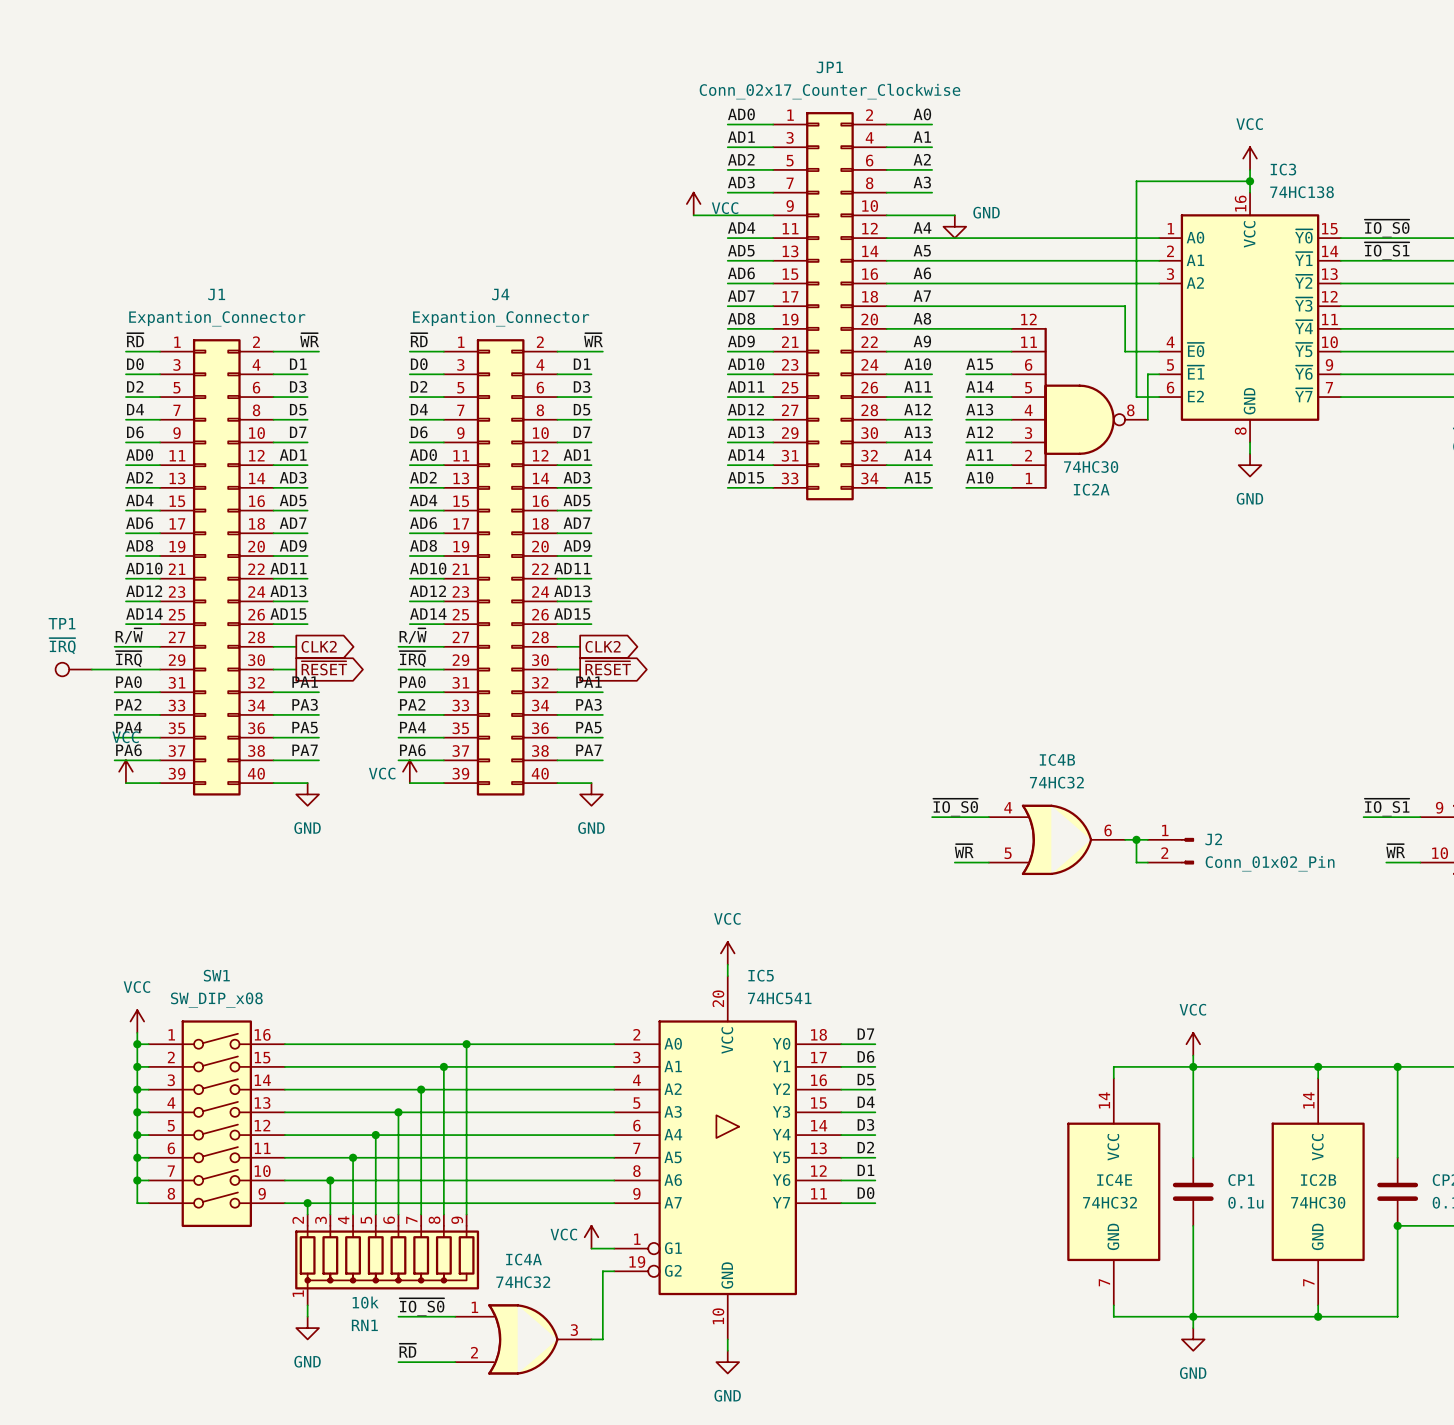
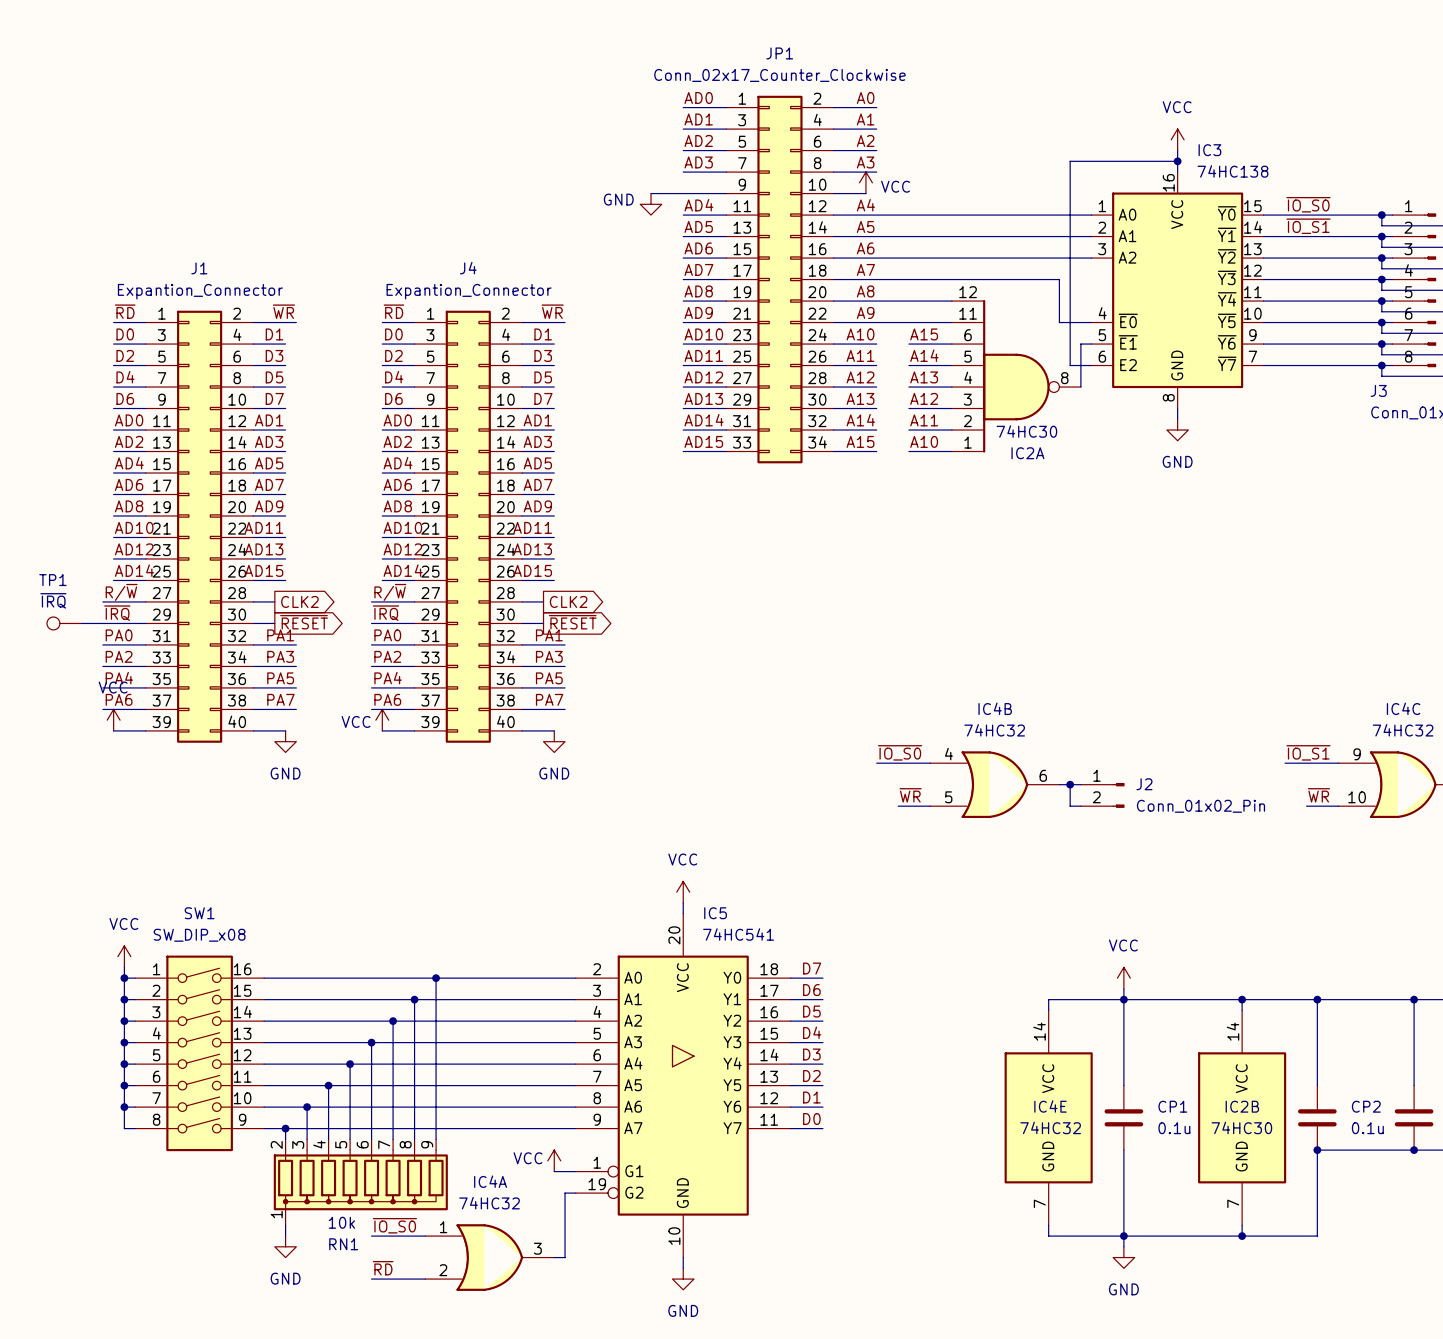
power symbol: VCC (693, 204) -> none
power symbol: none -> VCC (865, 182)
wire: (920, 215) (954, 215) -> none
power symbol: none -> GND (651, 204)
power symbol: GND (954, 226) -> none

